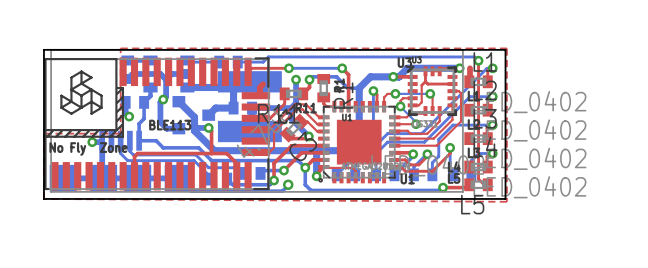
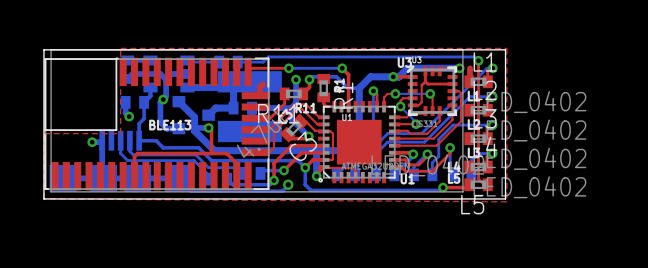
part footprint: [44, 57, 271, 191] -> [44, 57, 271, 191]
line: (81, 71) (81, 83) (101, 95) (101, 107) -> none
line: (81, 71) (71, 77) (71, 101) (61, 107) -> none
line: (81, 71) (91, 77) (71, 89) (81, 95) -> none
line: (81, 95) (91, 89) (91, 113) (101, 107) -> none
line: (81, 95) (81, 107) (61, 95) (61, 107) -> none
line: (61, 107) (71, 113) (91, 101) (101, 107) -> none
top track: (306, 121) (317, 131) (323, 131) -> (306, 121) (315, 130) (330, 131) (332, 133) (332, 159) (323, 159)

